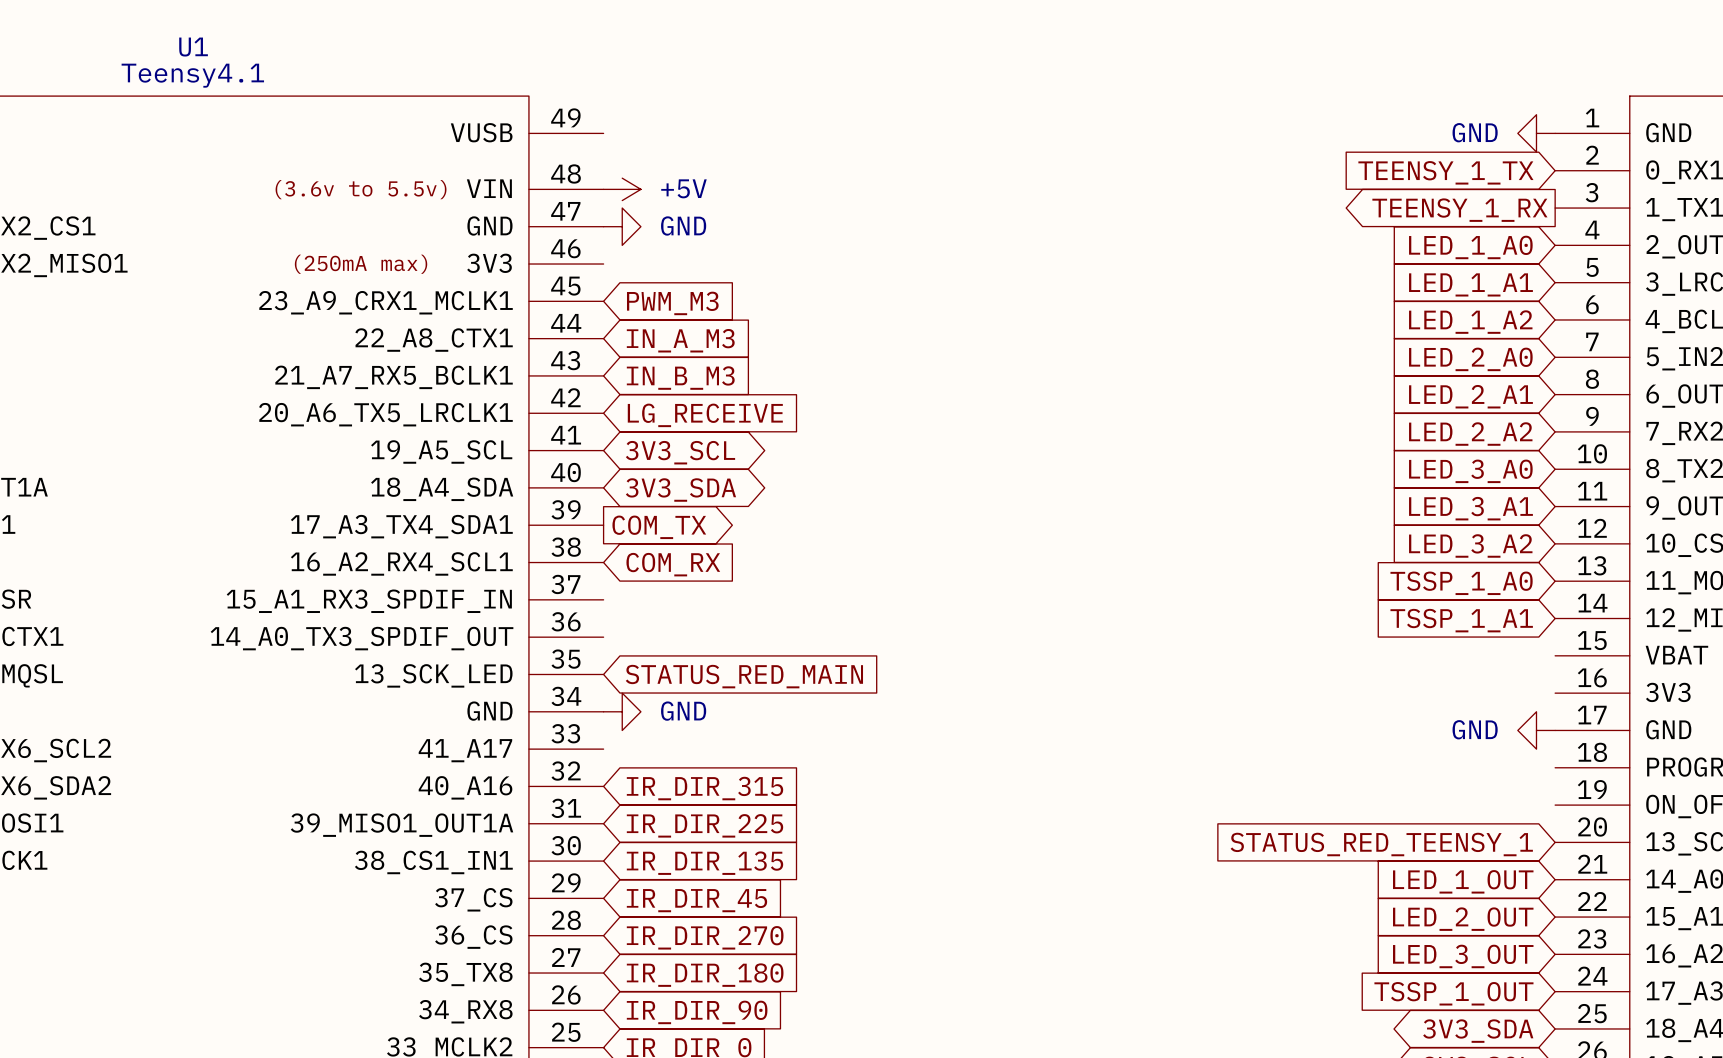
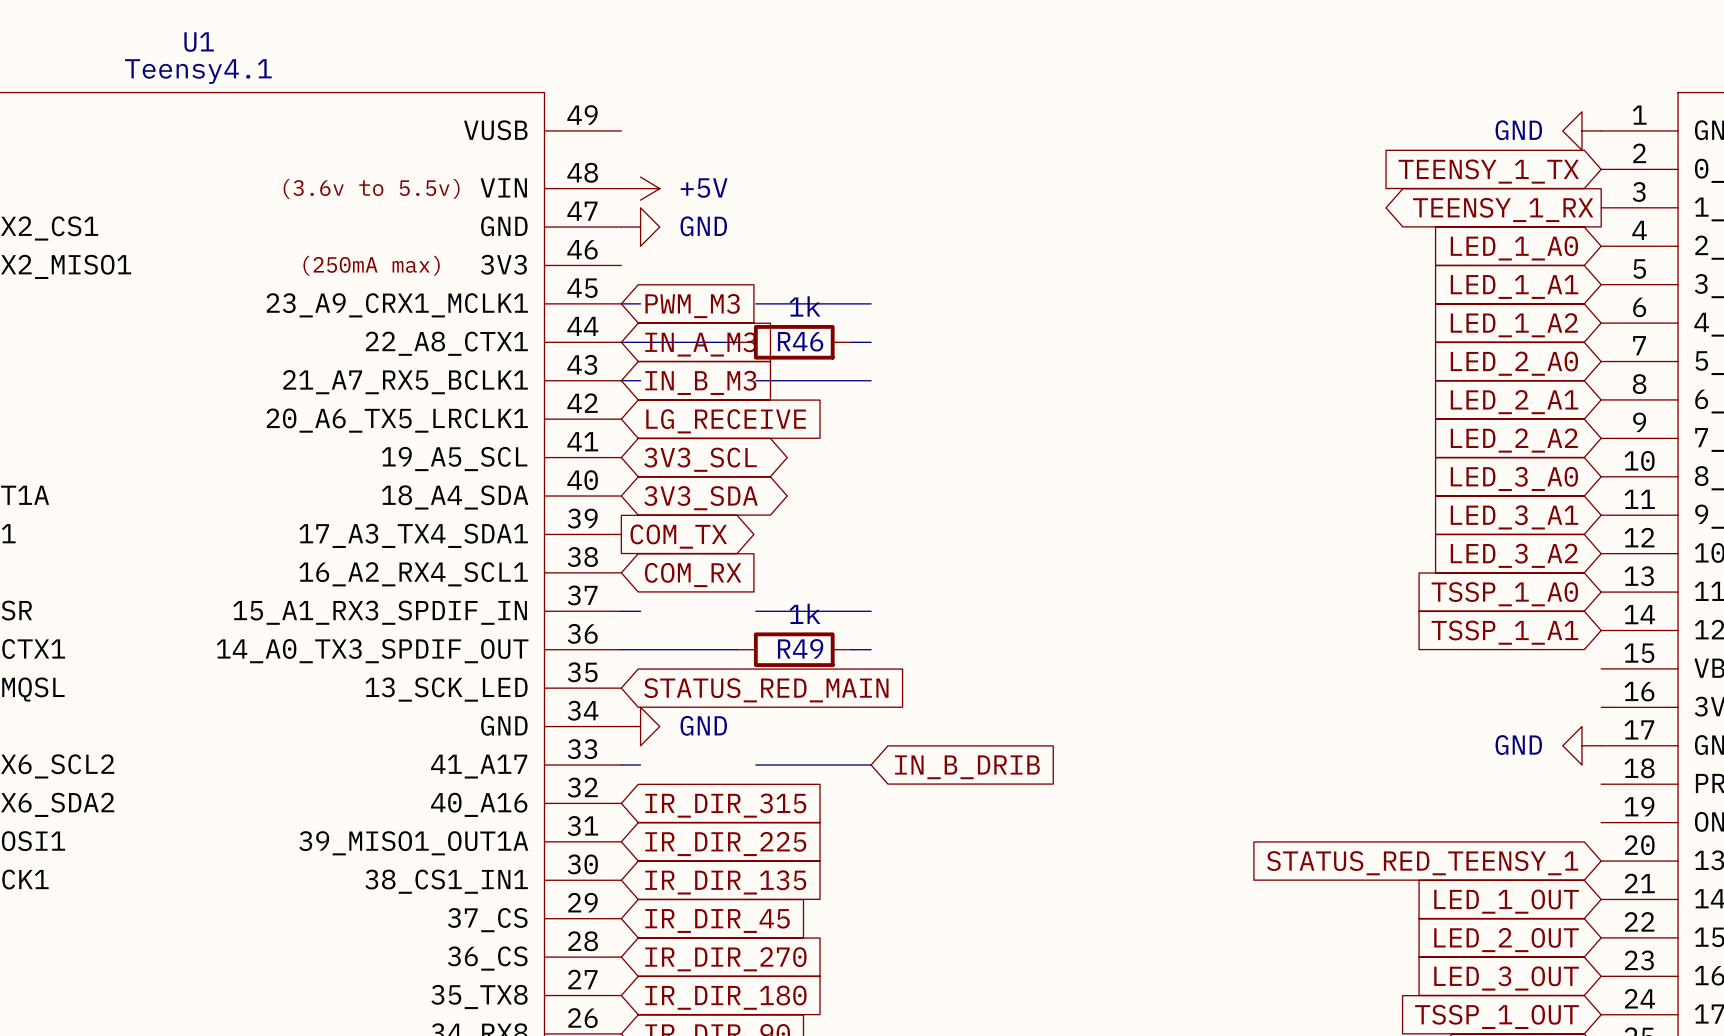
wire: none -> (621, 303) (640, 303)
wire: none -> (755, 303) (871, 303)
wire: none -> (621, 342) (736, 342)
R46: none -> 1k (794, 342)
wire: none -> (851, 342) (871, 342)
wire: none -> (621, 380) (640, 380)
wire: none -> (755, 380) (871, 380)
wire: none -> (621, 611) (640, 611)
wire: none -> (755, 611) (871, 611)
wire: none -> (621, 649) (736, 649)
R49: none -> 1k (794, 649)
wire: none -> (851, 649) (871, 649)
wire: none -> (621, 764) (640, 764)
wire: none -> (755, 764) (871, 764)
global label: none -> IN_B_DRIB (967, 767)

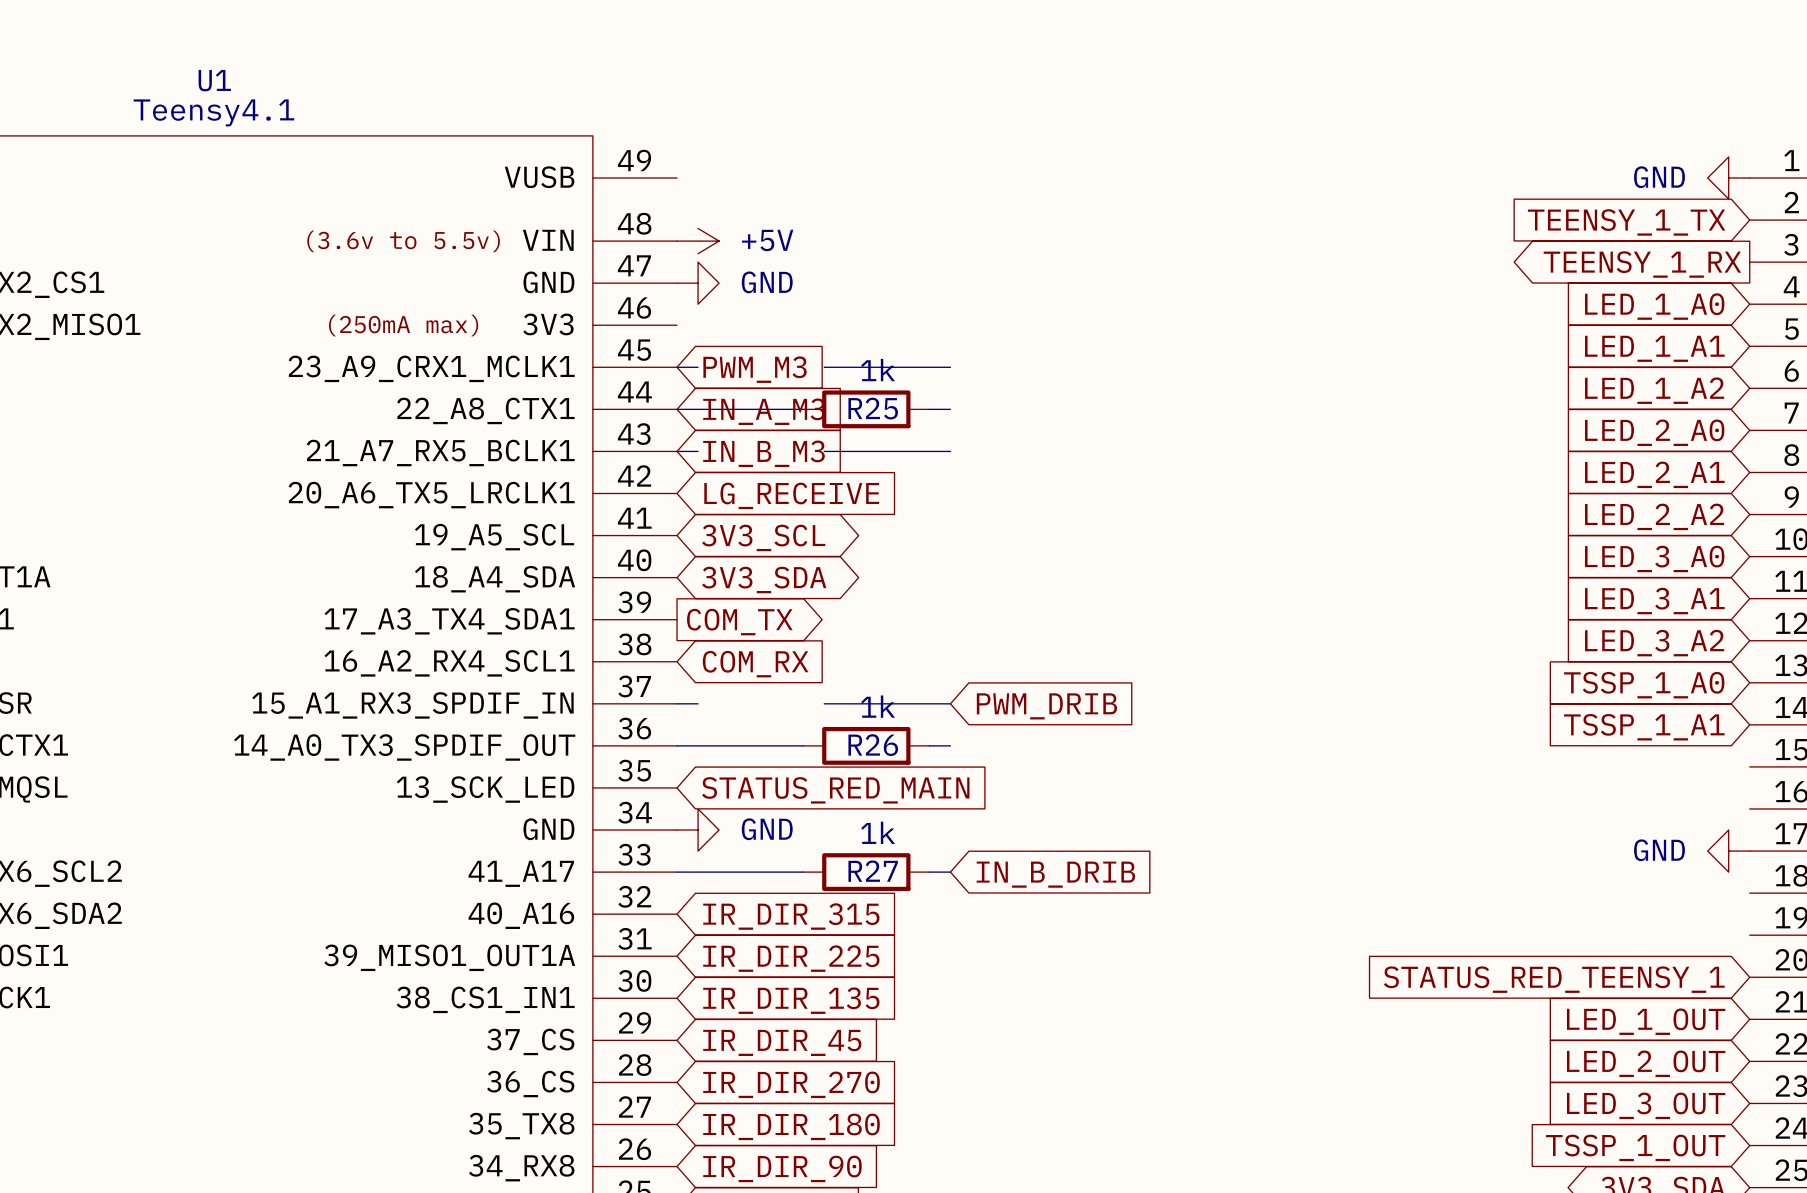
R46 name: R46 (800, 341) -> R25 (873, 408)
global label: none -> PWM_DRIB (1046, 706)
R49 name: R49 (800, 648) -> R26 (873, 745)
wire: (755, 764) (851, 764) -> (698, 872) (803, 872)
R27: none -> 1k (866, 872)

